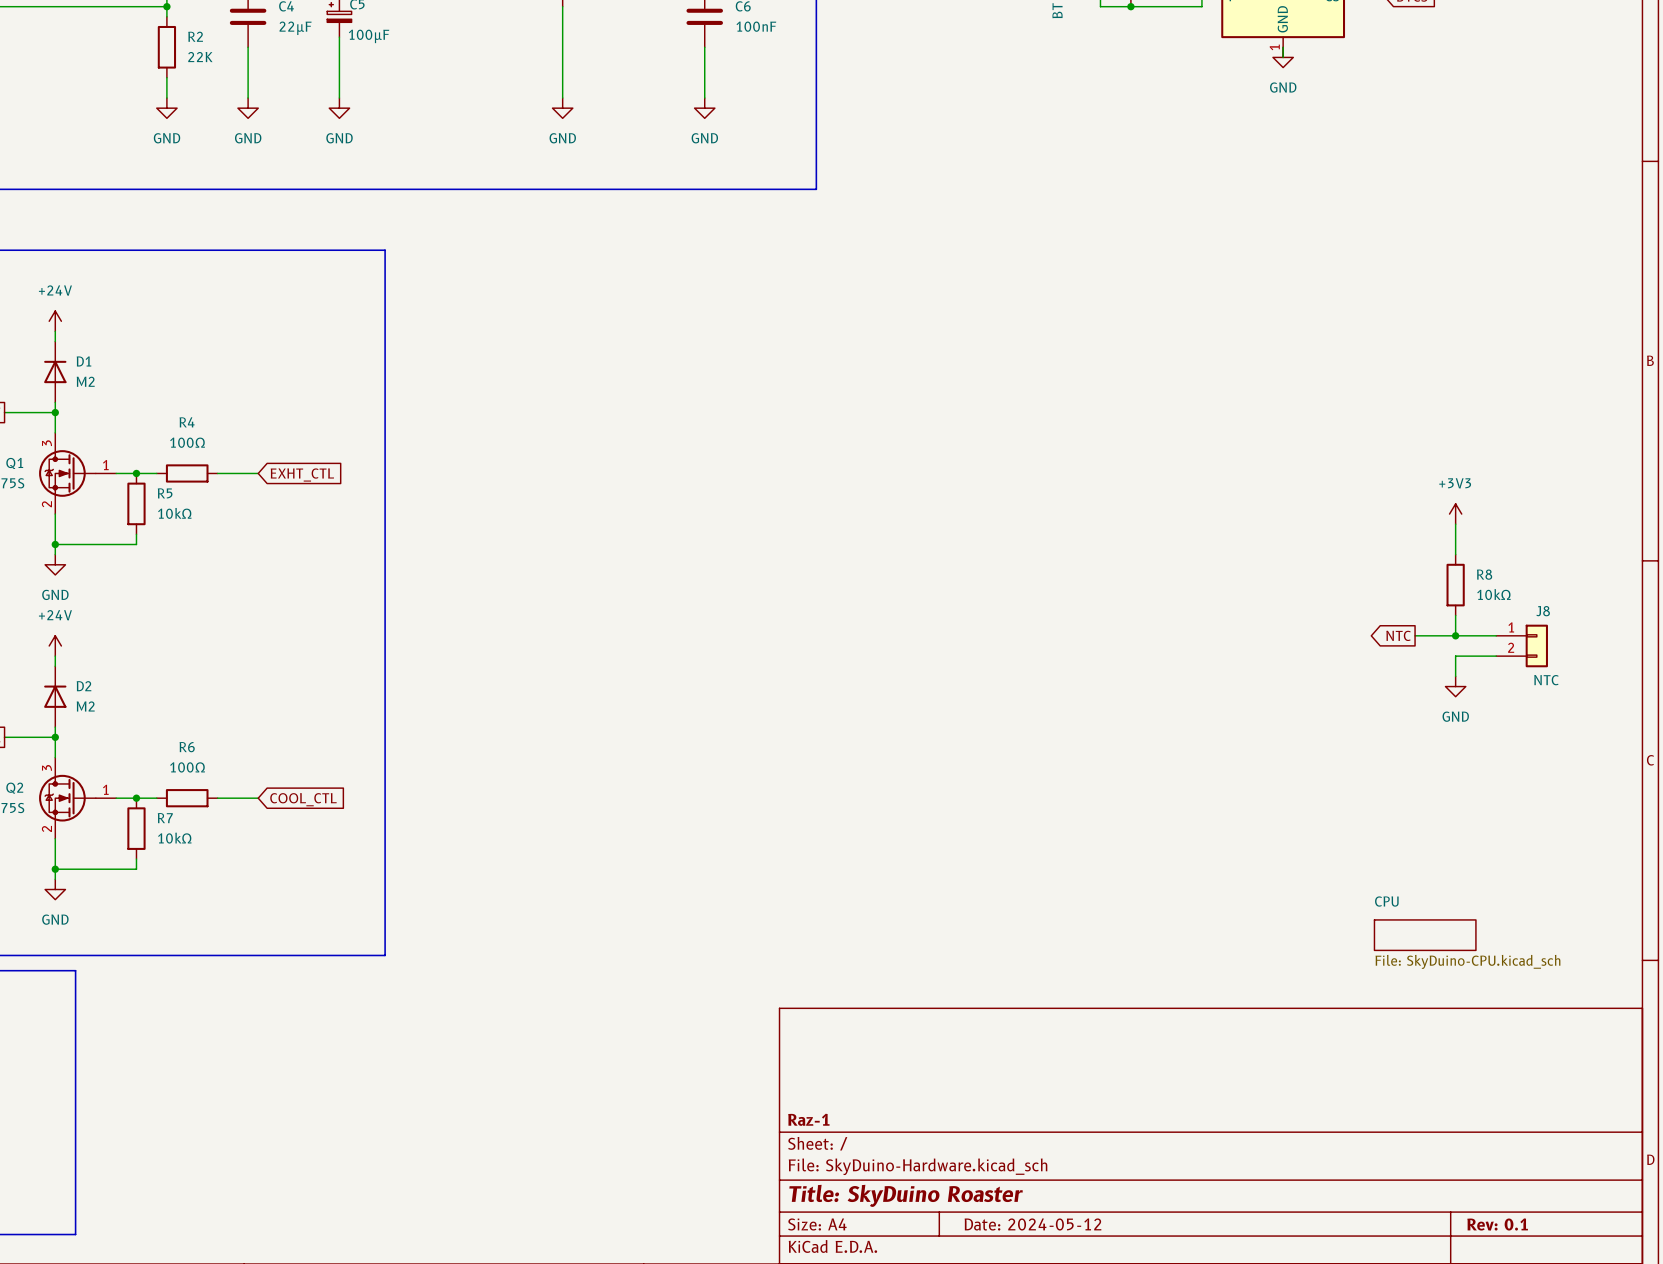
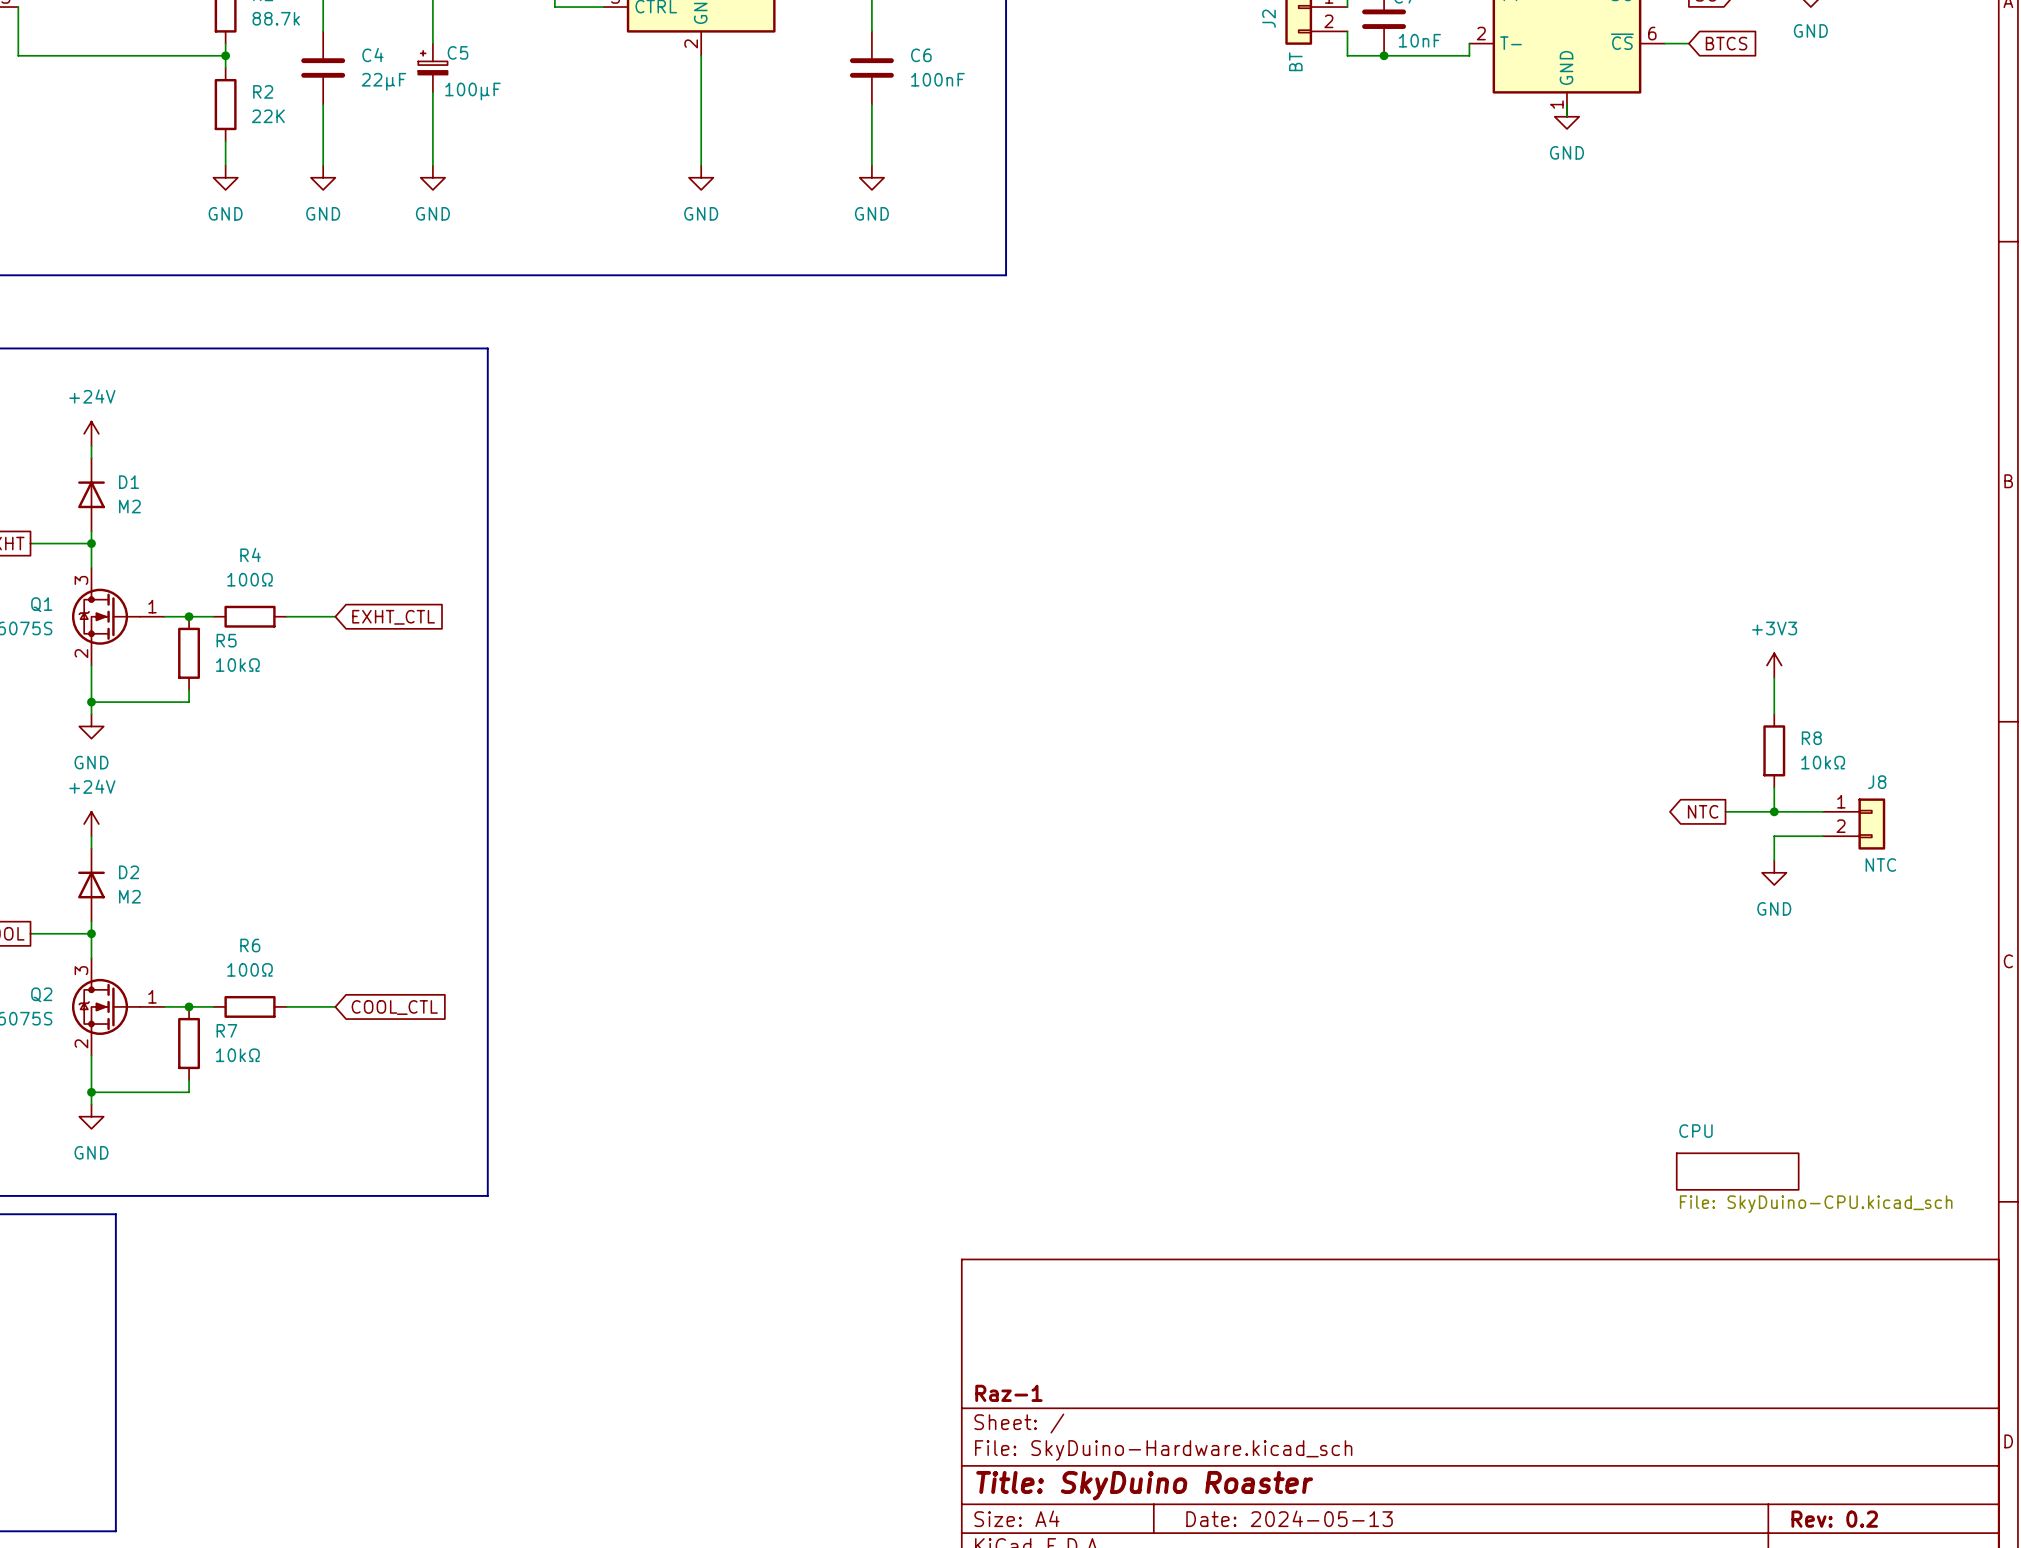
title block: Date: 2024-05-12 (1032, 1224) -> Date: 2024-05-13 (1289, 1518)
title block: Rev: 0.1 (1497, 1224) -> Rev: 0.2 (1834, 1519)

